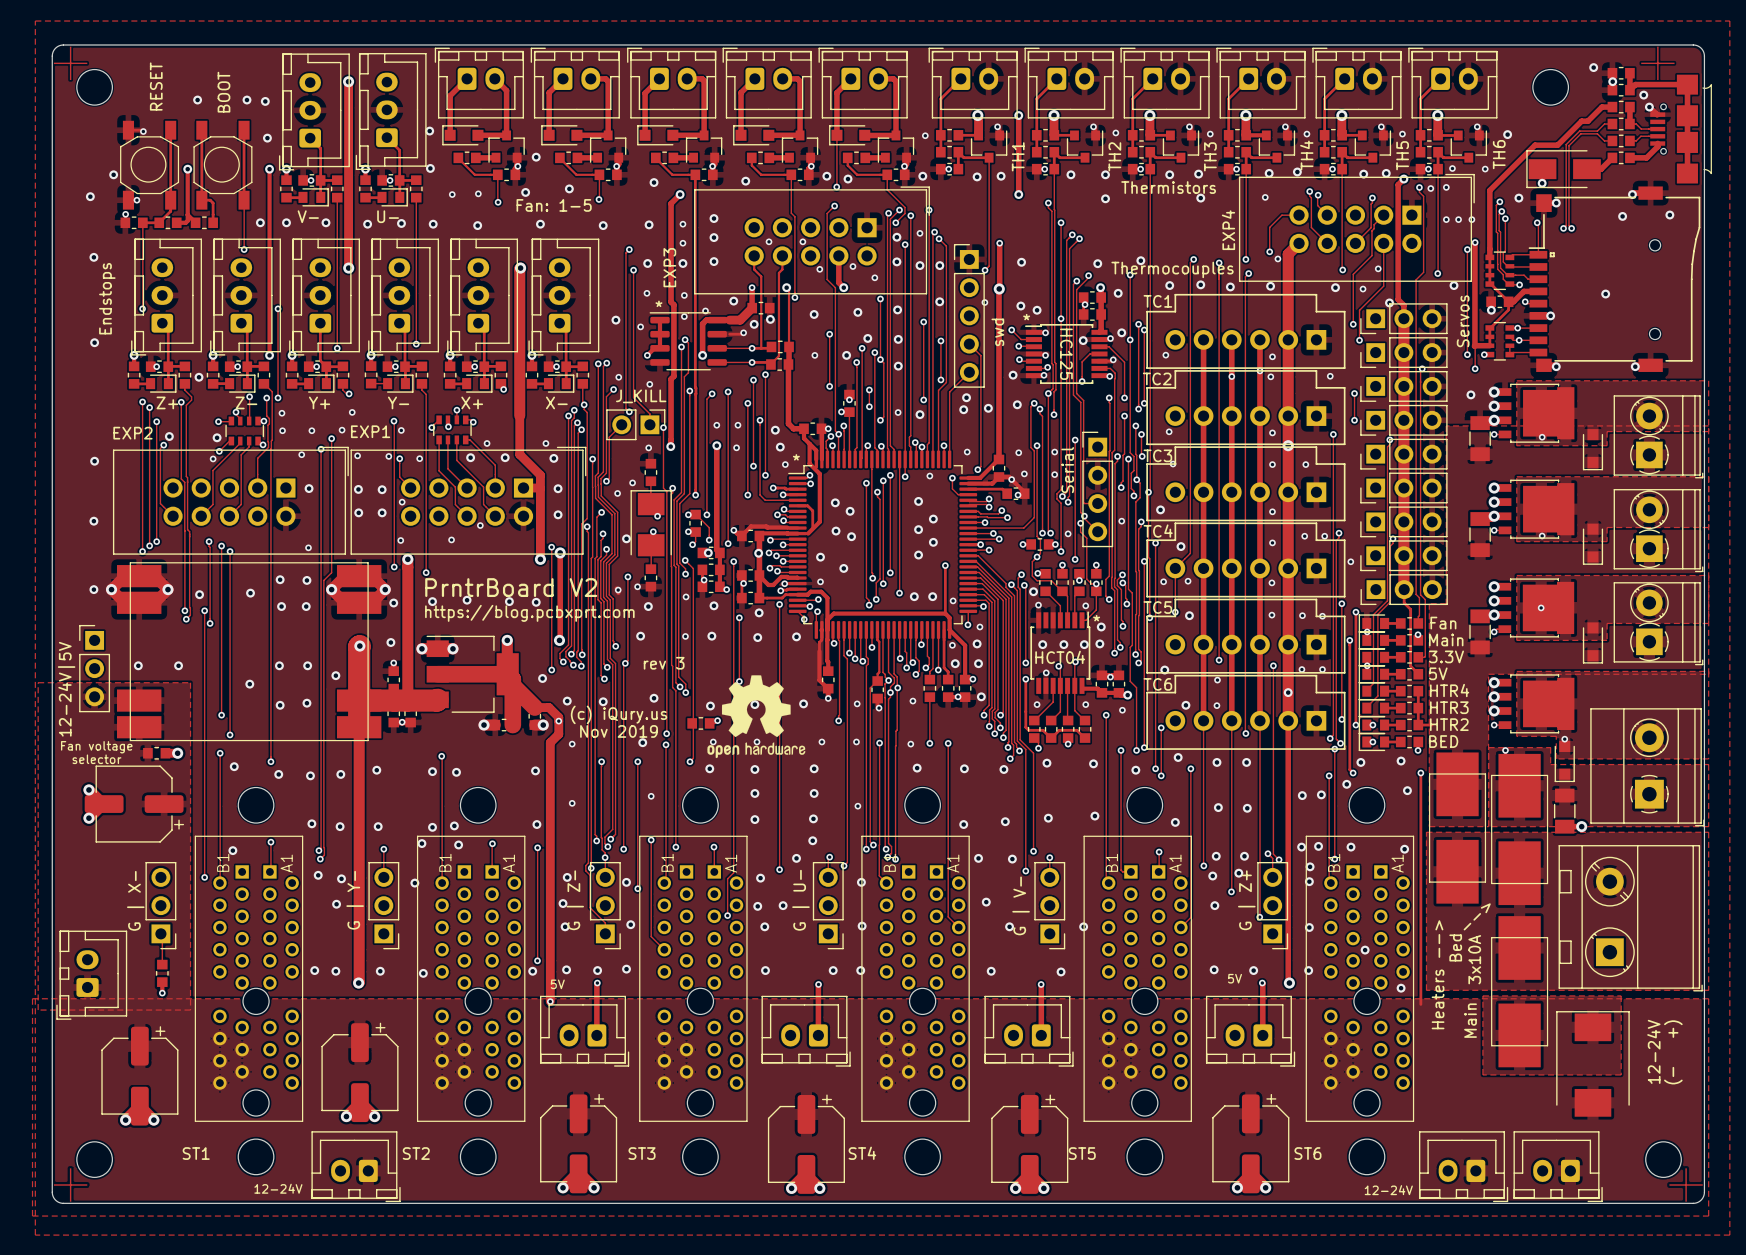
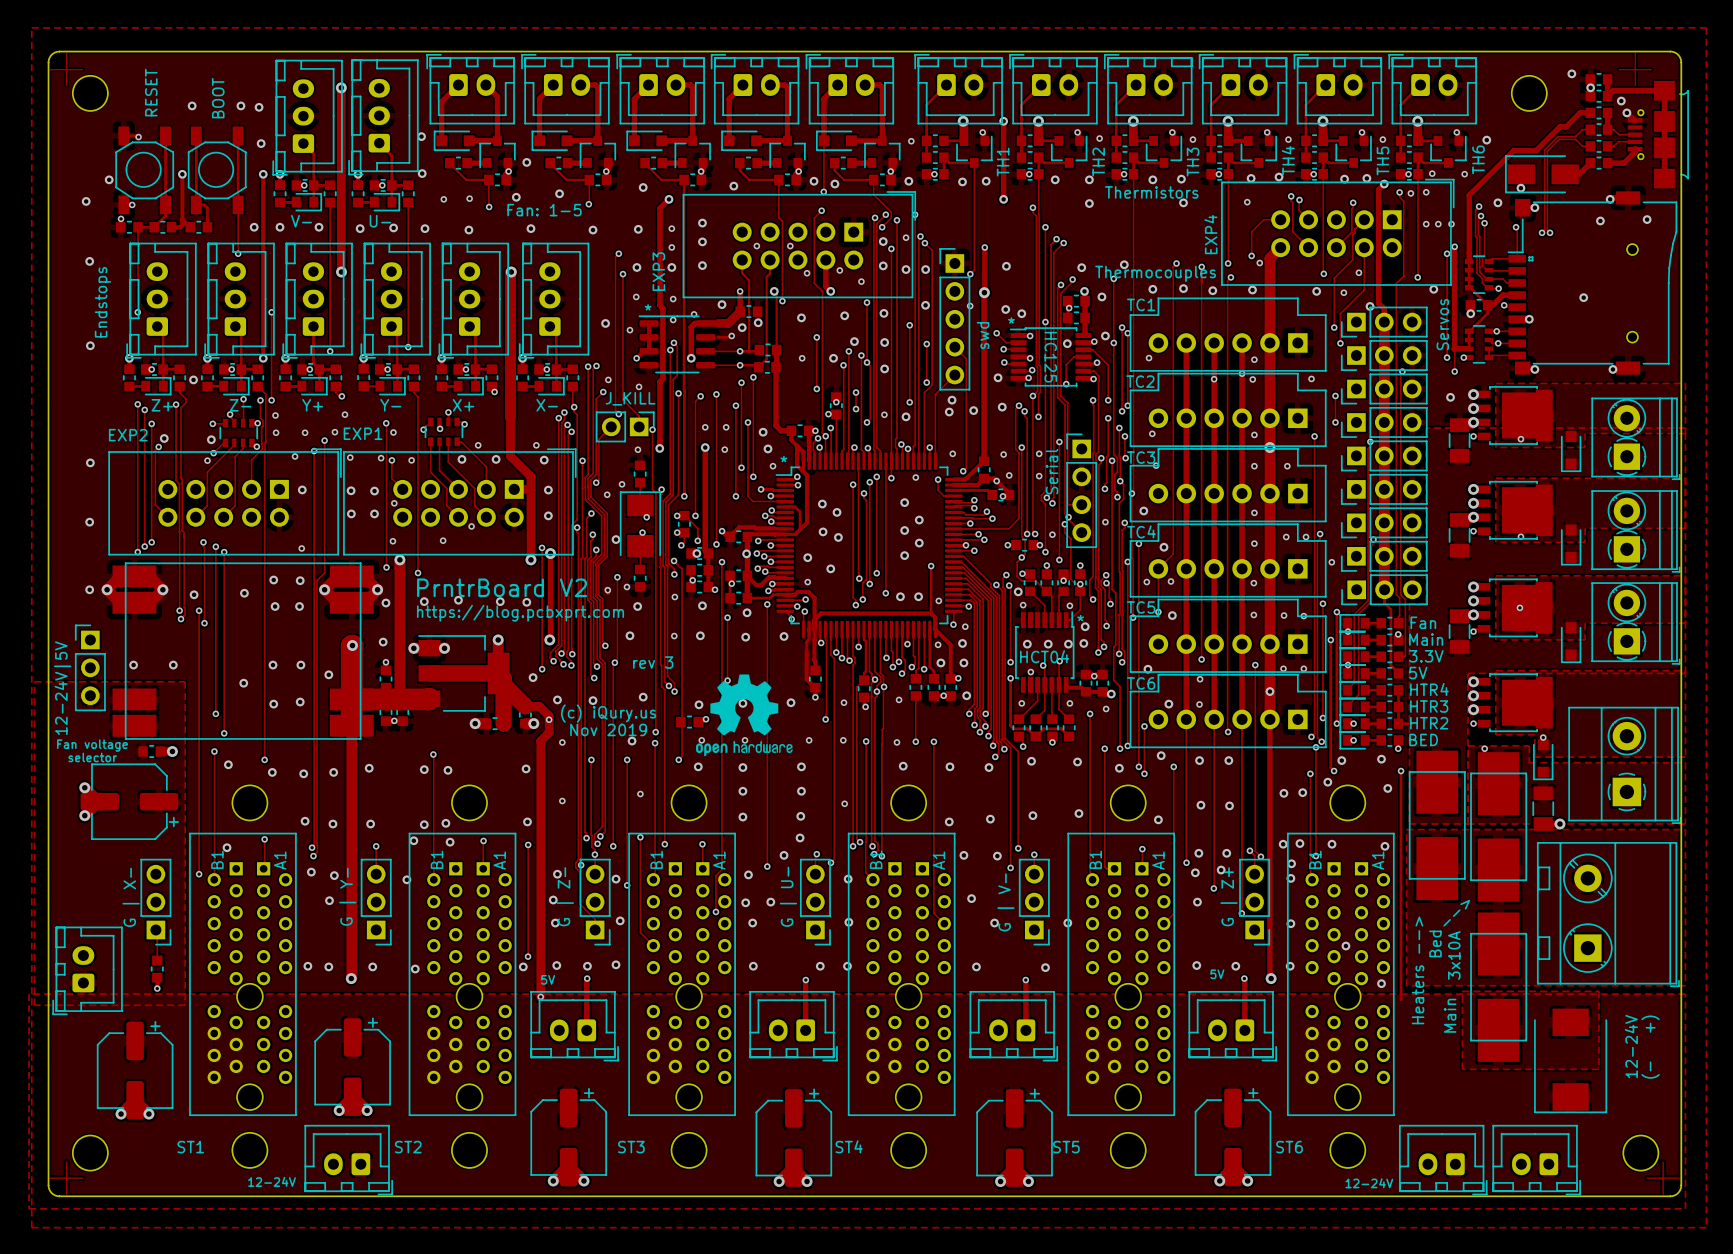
part rotation: 0° (1592, 1063) -> 180° (1570, 1060)

